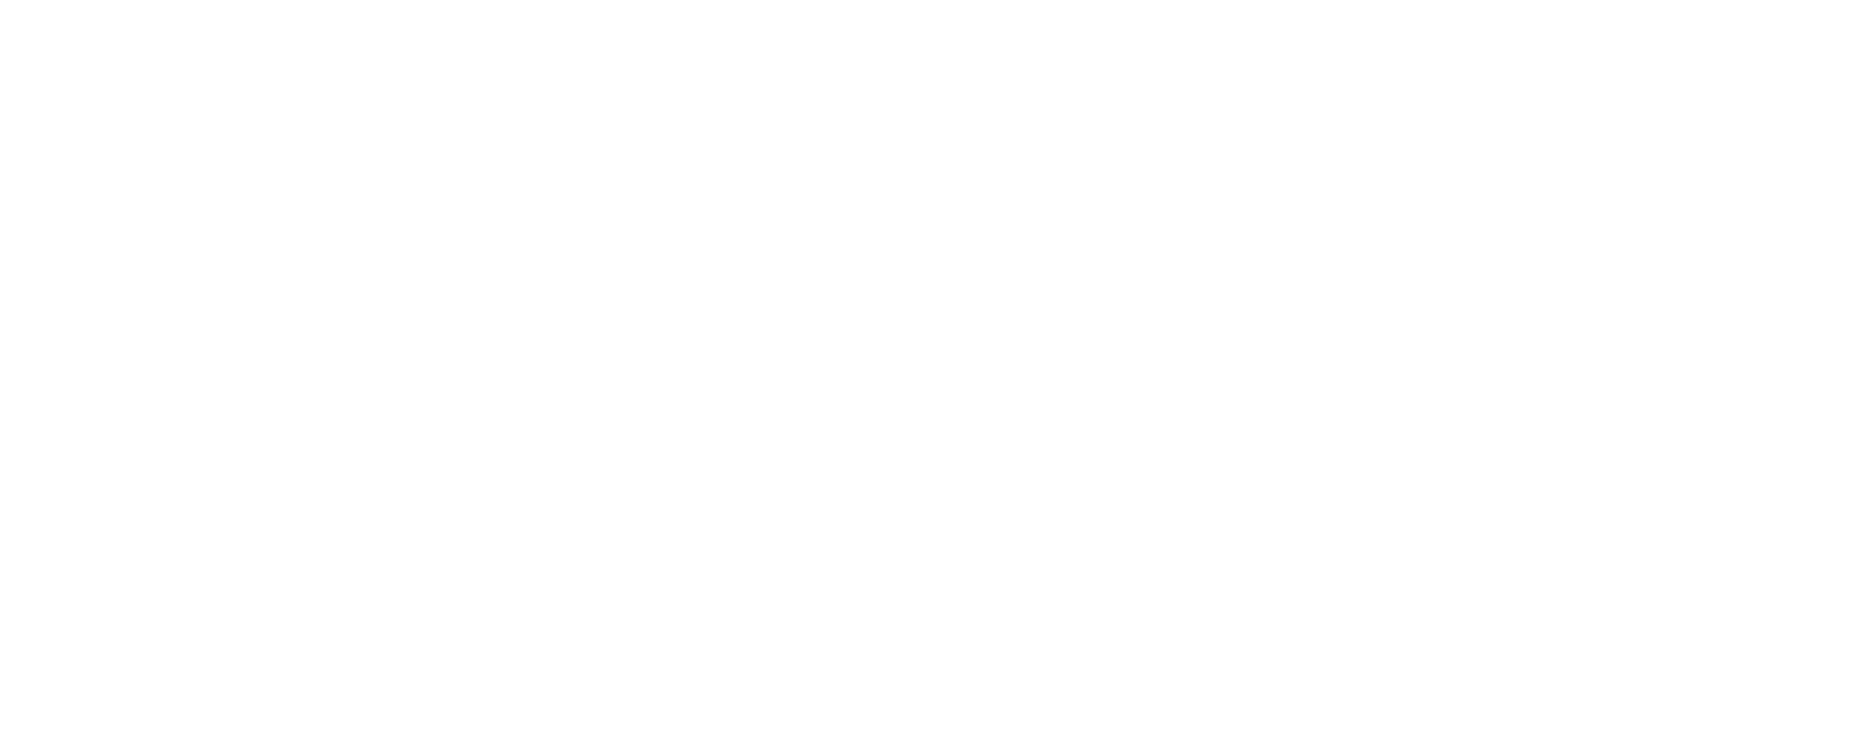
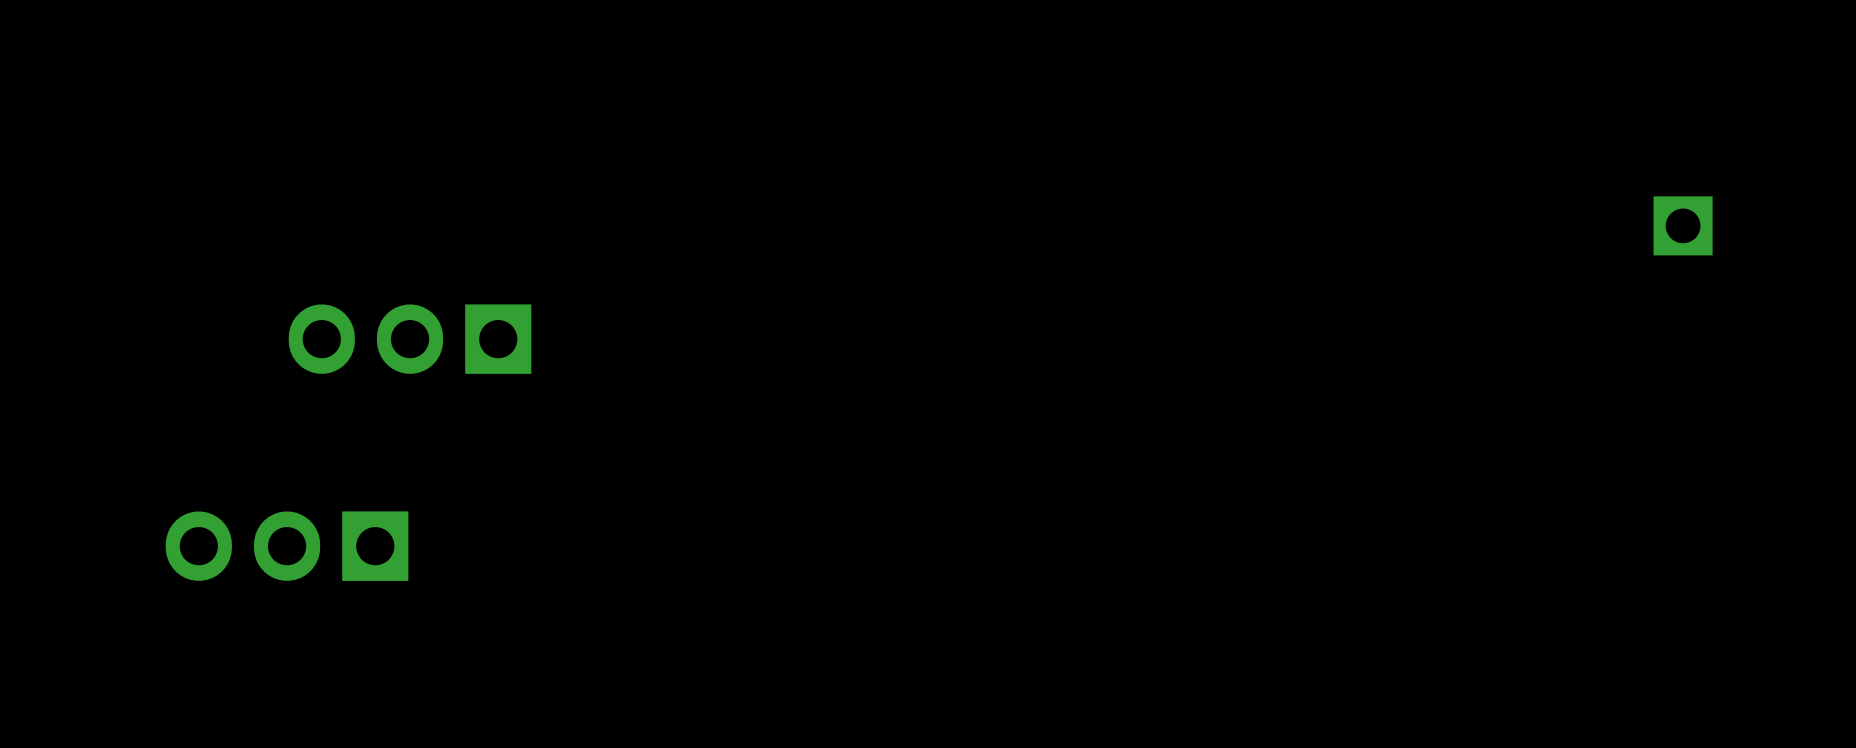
part: none -> (1683, 225)
part: none -> (410, 339)
part: none -> (287, 546)

